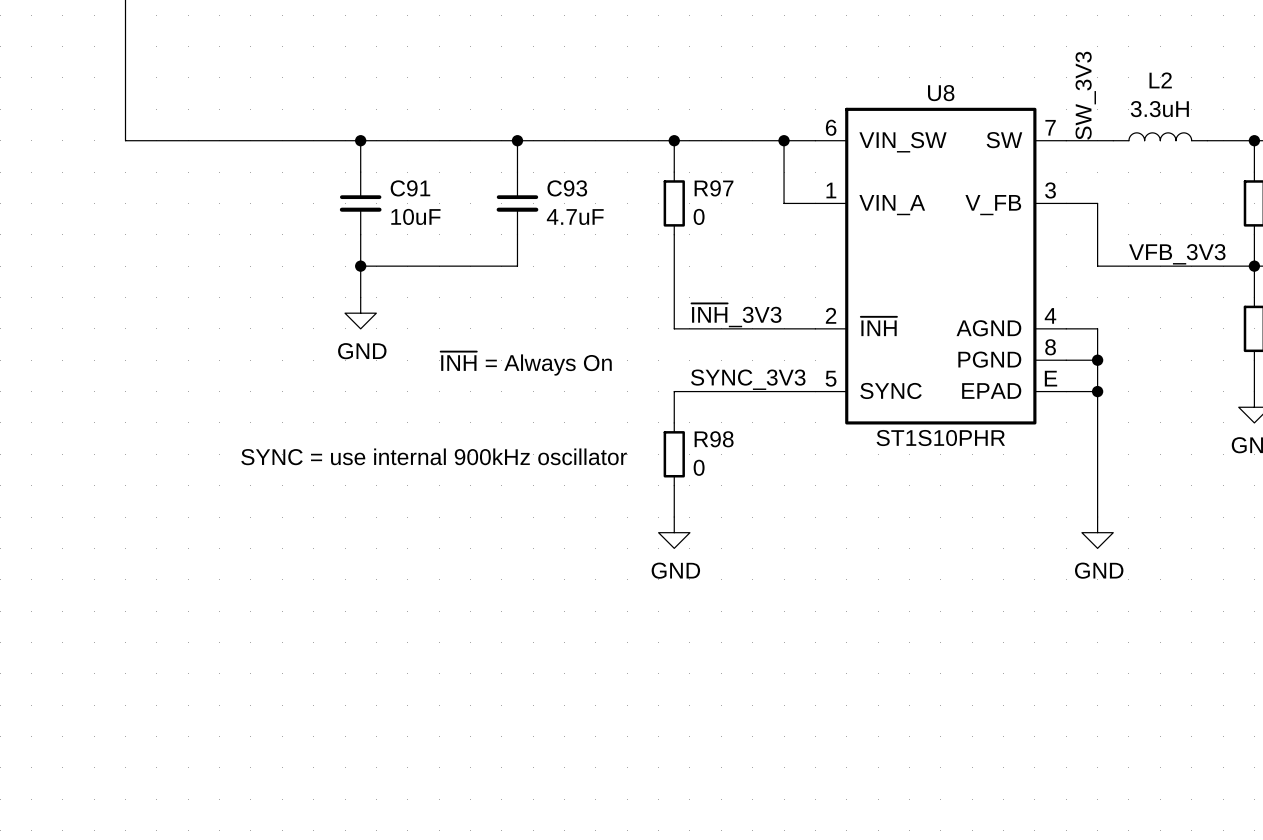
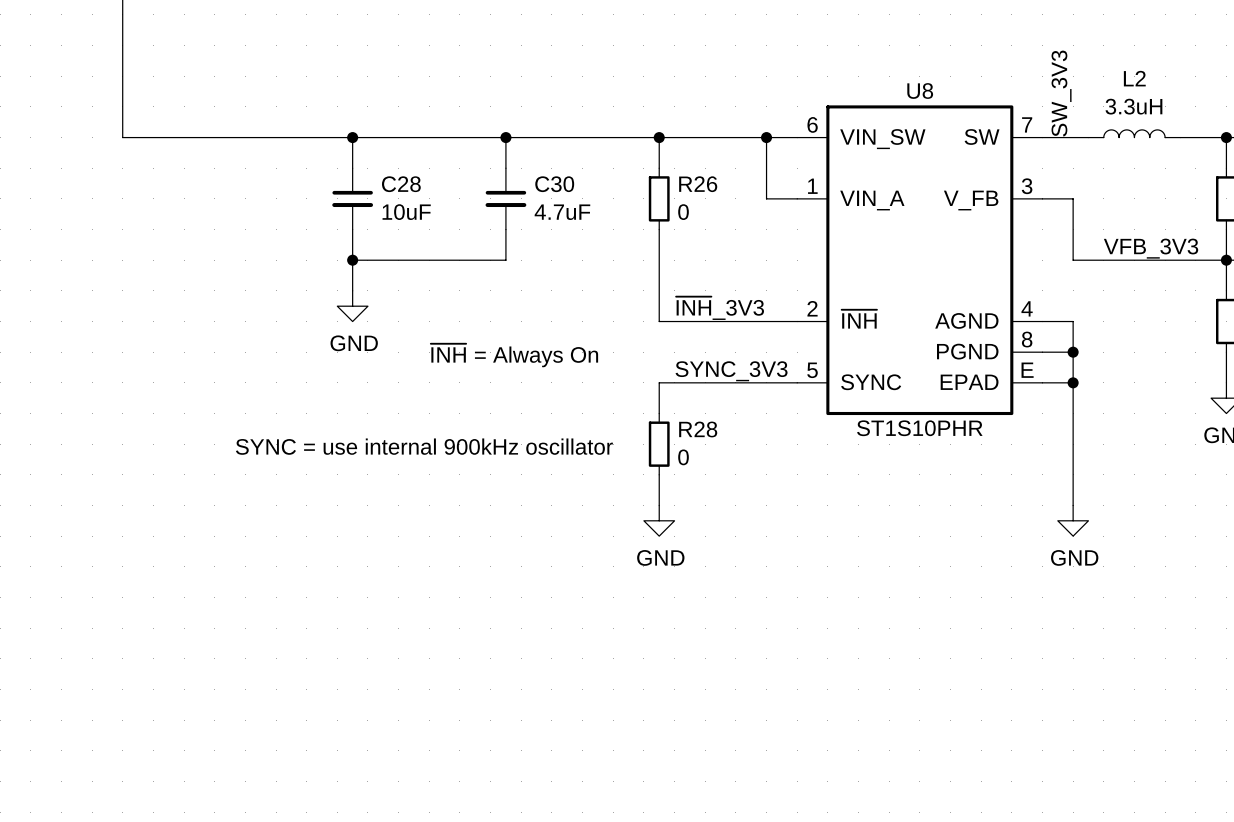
C91 name: C91 (410, 188) -> C28 (401, 184)
C93 name: C93 (567, 188) -> C30 (554, 184)
R97 name: R97 (714, 188) -> R26 (698, 184)
R98 name: R98 (714, 439) -> R28 (698, 429)

